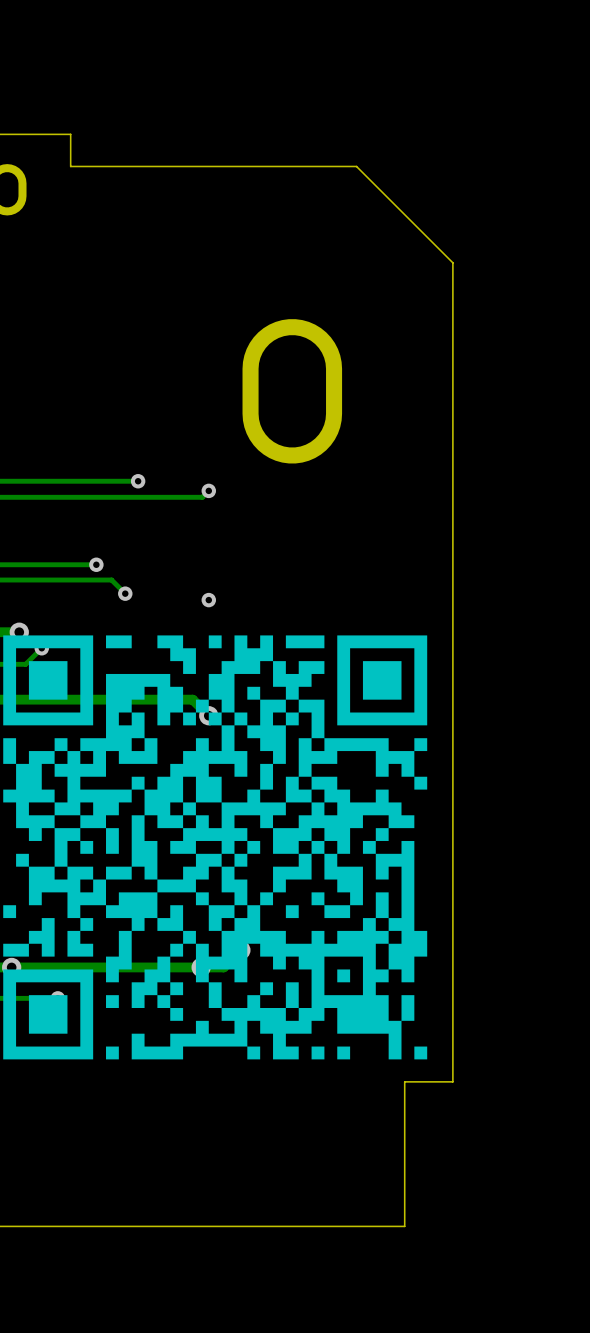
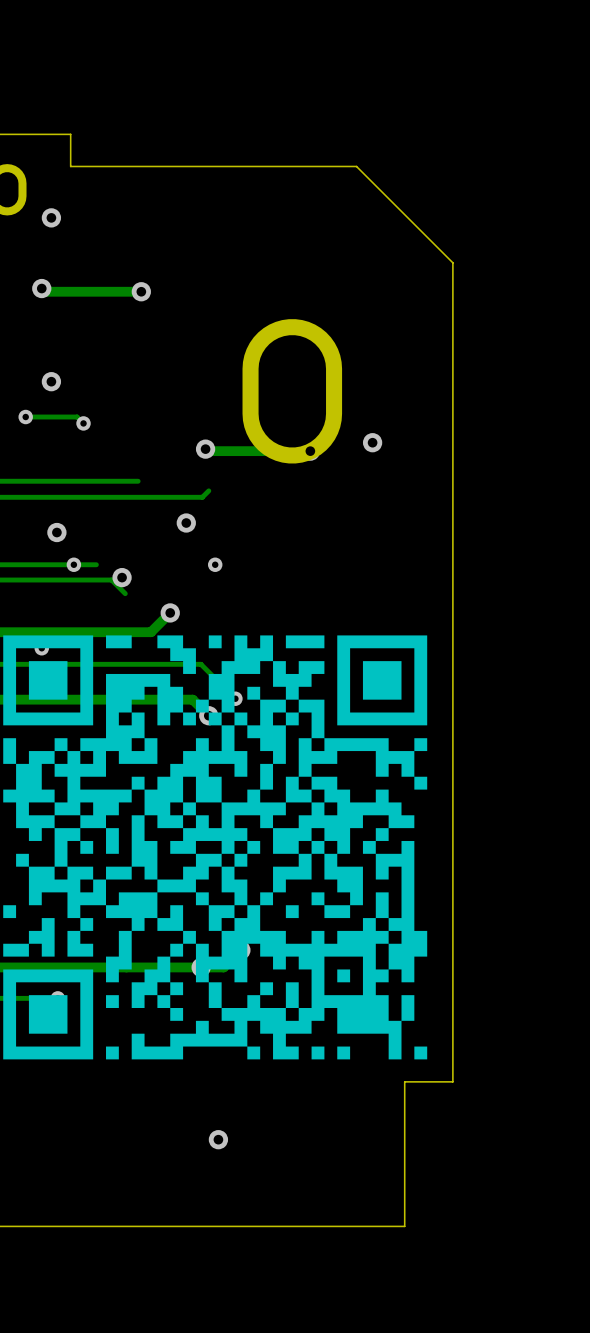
via: none -> (51, 217)
track: none -> (41, 288) (44, 291) (141, 291)
via: none -> (41, 288)
via: none -> (141, 291)
via: none -> (51, 381)
track: none -> (25, 417) (77, 417) (83, 423)
via: none -> (25, 417)
via: none -> (83, 423)
via: none -> (372, 442)
track: none -> (205, 449) (207, 451) (310, 451)
via: none -> (205, 449)
via: none -> (310, 451)
via: (138, 481) -> none
via: (208, 490) -> none
via: none -> (186, 523)
via: none -> (56, 532)
via position: (96, 564) -> (73, 564)
via position: (125, 593) -> (122, 577)
via position: (208, 600) -> (215, 564)
track: none -> (170, 612) (150, 632) (19, 632)
via: none -> (170, 612)
via: (19, 632) -> none
track: (41, 648) (25, 664) -> (235, 698) (200, 664) (25, 664)
via: none -> (235, 698)
via: (11, 967) -> none
via: none -> (218, 1139)

